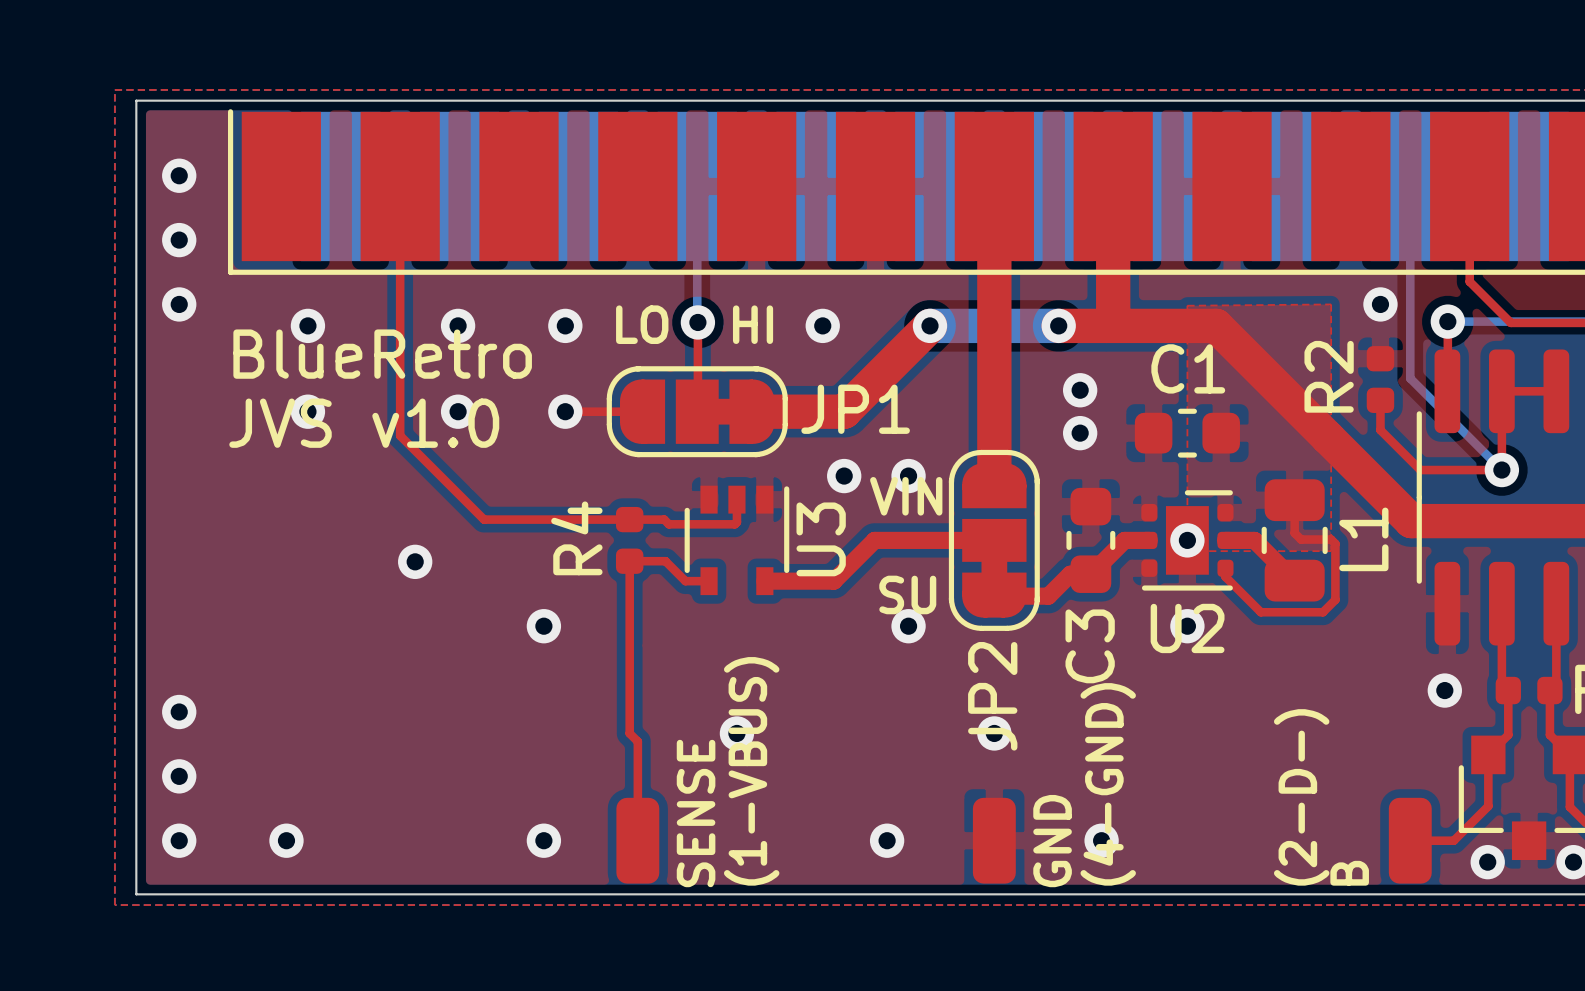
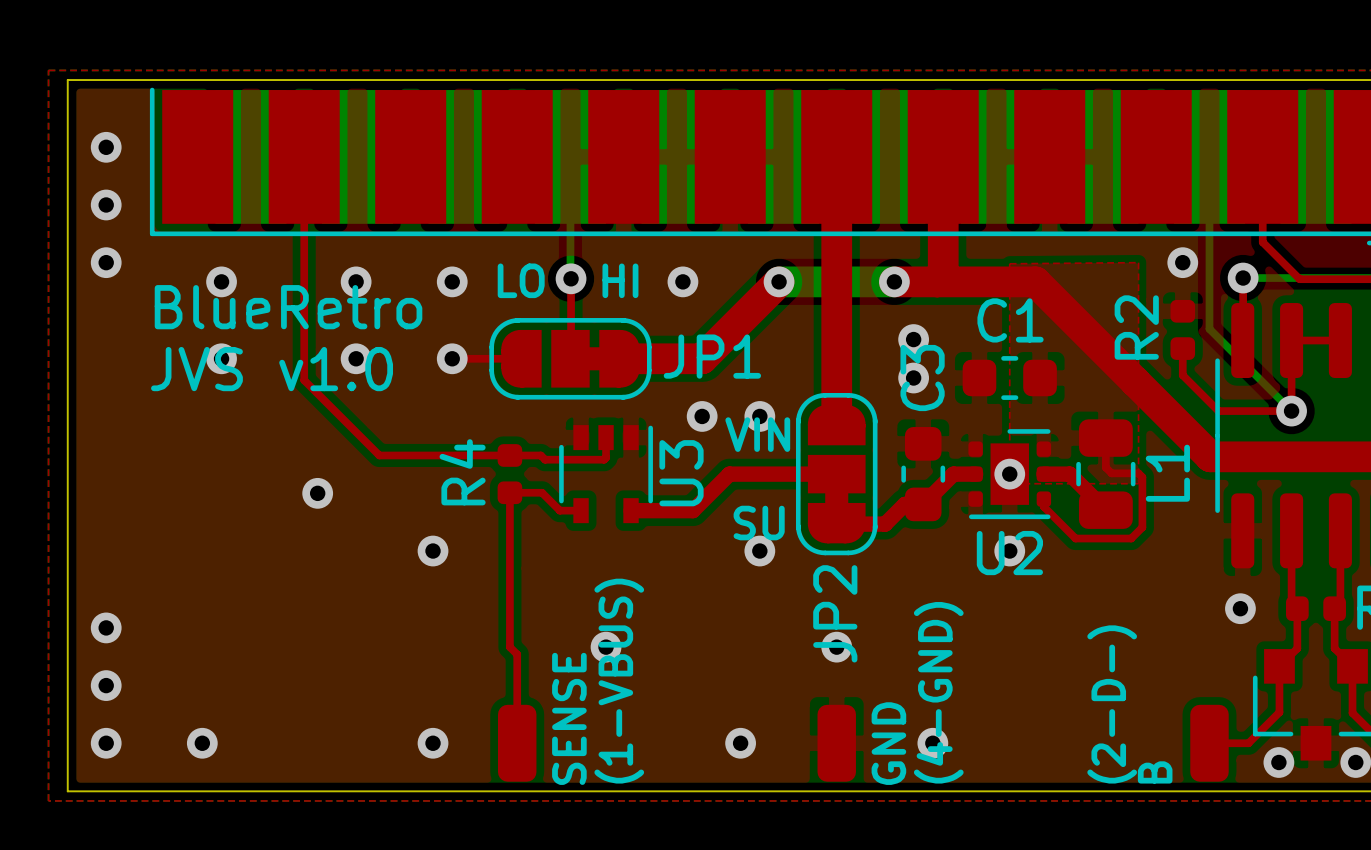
C3 name position: C3 (1090, 646) -> C3 (922, 378)

